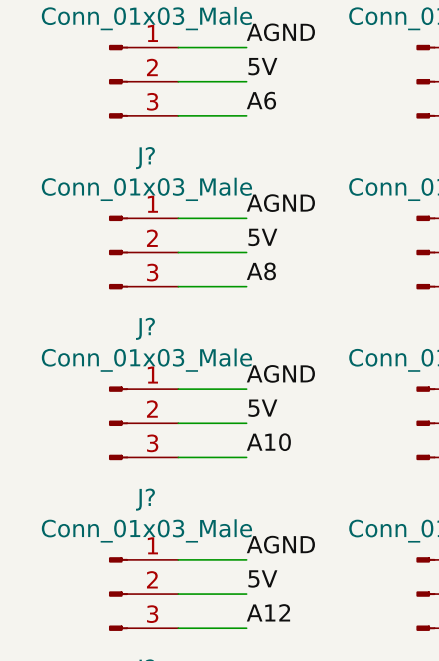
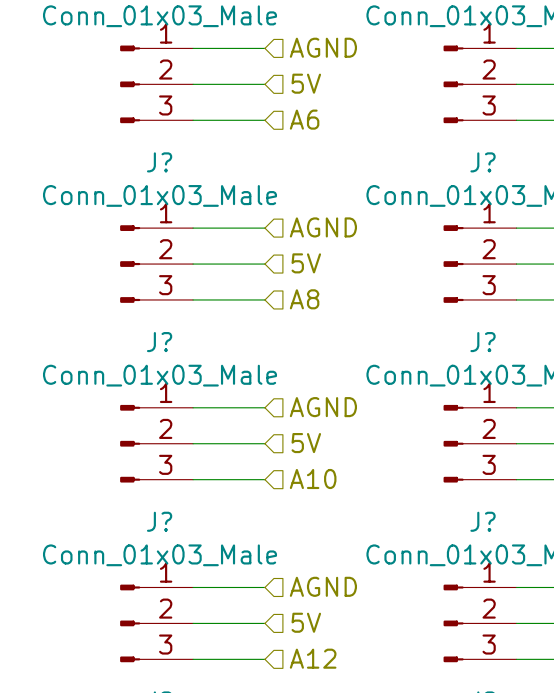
label: AGND (280, 32) -> none
hierarchical label: none -> AGND (323, 47)
label: 5V (262, 66) -> none
hierarchical label: none -> 5V (306, 83)
label: A6 (261, 100) -> none
hierarchical label: none -> A6 (304, 119)
label: AGND (280, 203) -> none
hierarchical label: none -> AGND (323, 227)
label: 5V (262, 237) -> none
hierarchical label: none -> 5V (306, 263)
label: A8 (261, 271) -> none
hierarchical label: none -> A8 (304, 299)
label: AGND (280, 373) -> none
hierarchical label: none -> AGND (323, 407)
label: 5V (262, 408) -> none
hierarchical label: none -> 5V (306, 443)
label: A10 (268, 442) -> none
hierarchical label: none -> A10 (313, 479)
label: AGND (280, 544) -> none
hierarchical label: none -> AGND (323, 586)
label: 5V (262, 578) -> none
hierarchical label: none -> 5V (306, 622)
label: A12 (268, 612) -> none
hierarchical label: none -> A12 (313, 658)

